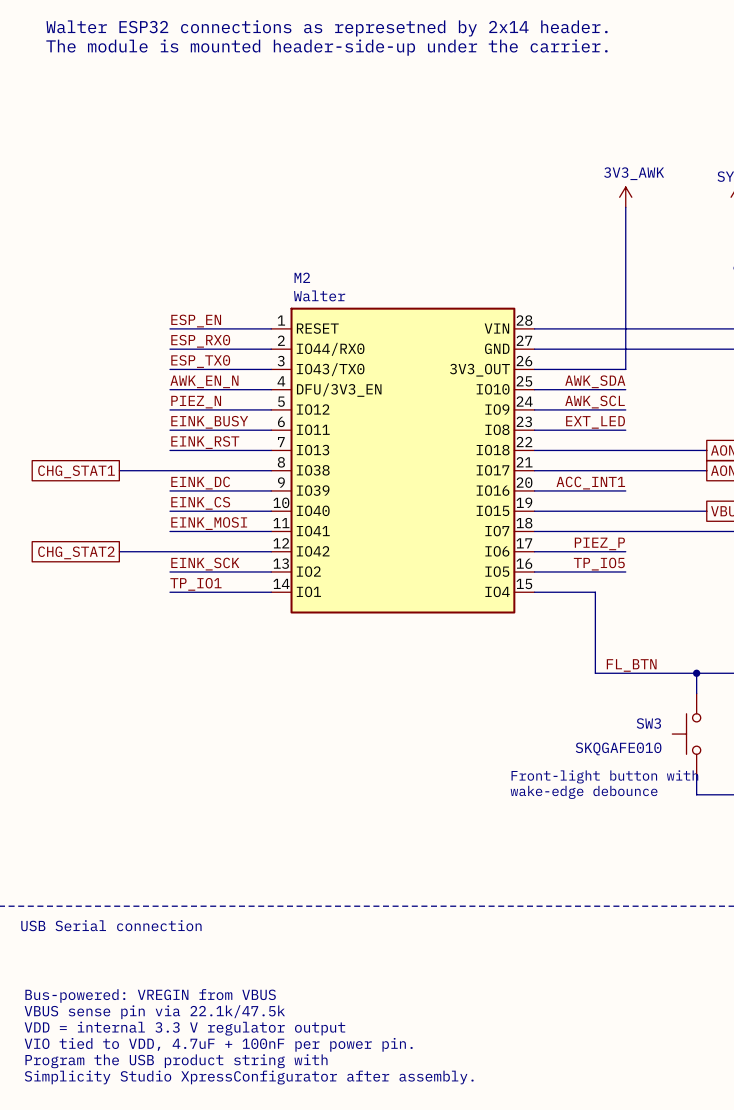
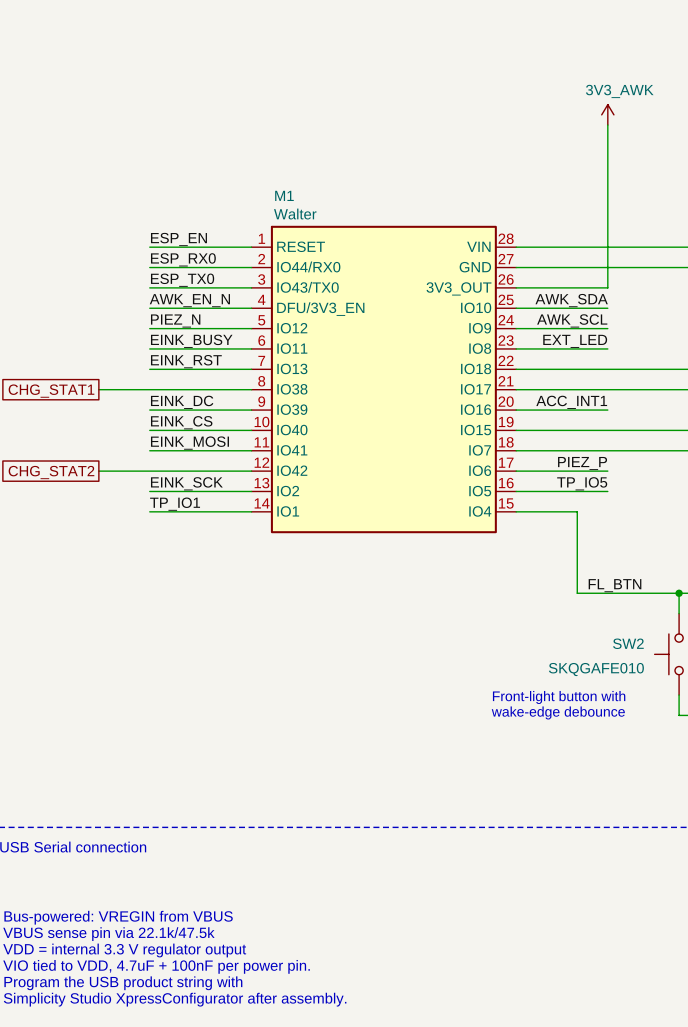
M2 name: M2 (302, 277) -> M1 (284, 195)
SW3 name: SW3 (648, 723) -> SW2 (628, 643)

